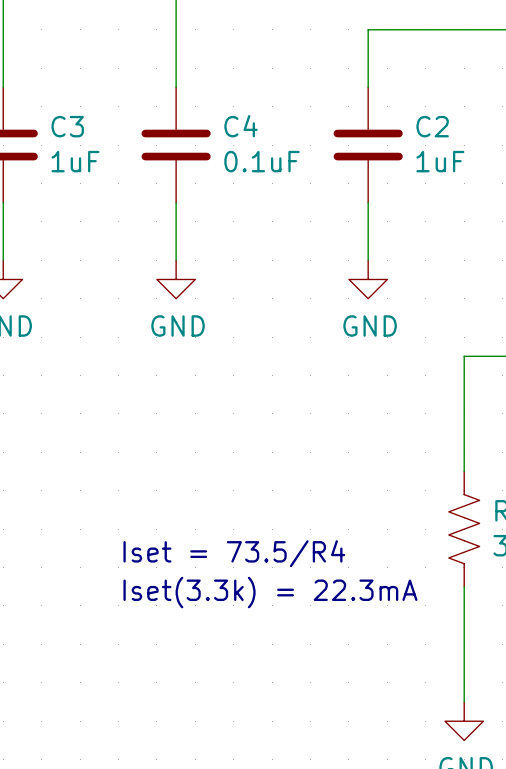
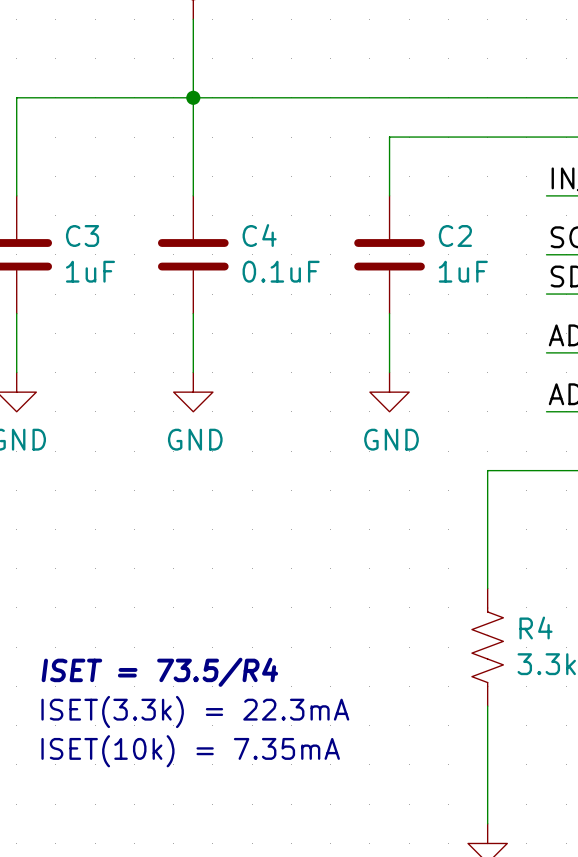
text: Iset = 73.5/R4 (234, 553) -> ISET = 73.5/R4 (159, 672)
text: Iset(3.3k) = 22.3mA (270, 592) -> ISET(3.3k) = 22.3mA (195, 711)
text: none -> ISET(10k) = 7.35mA (190, 751)

